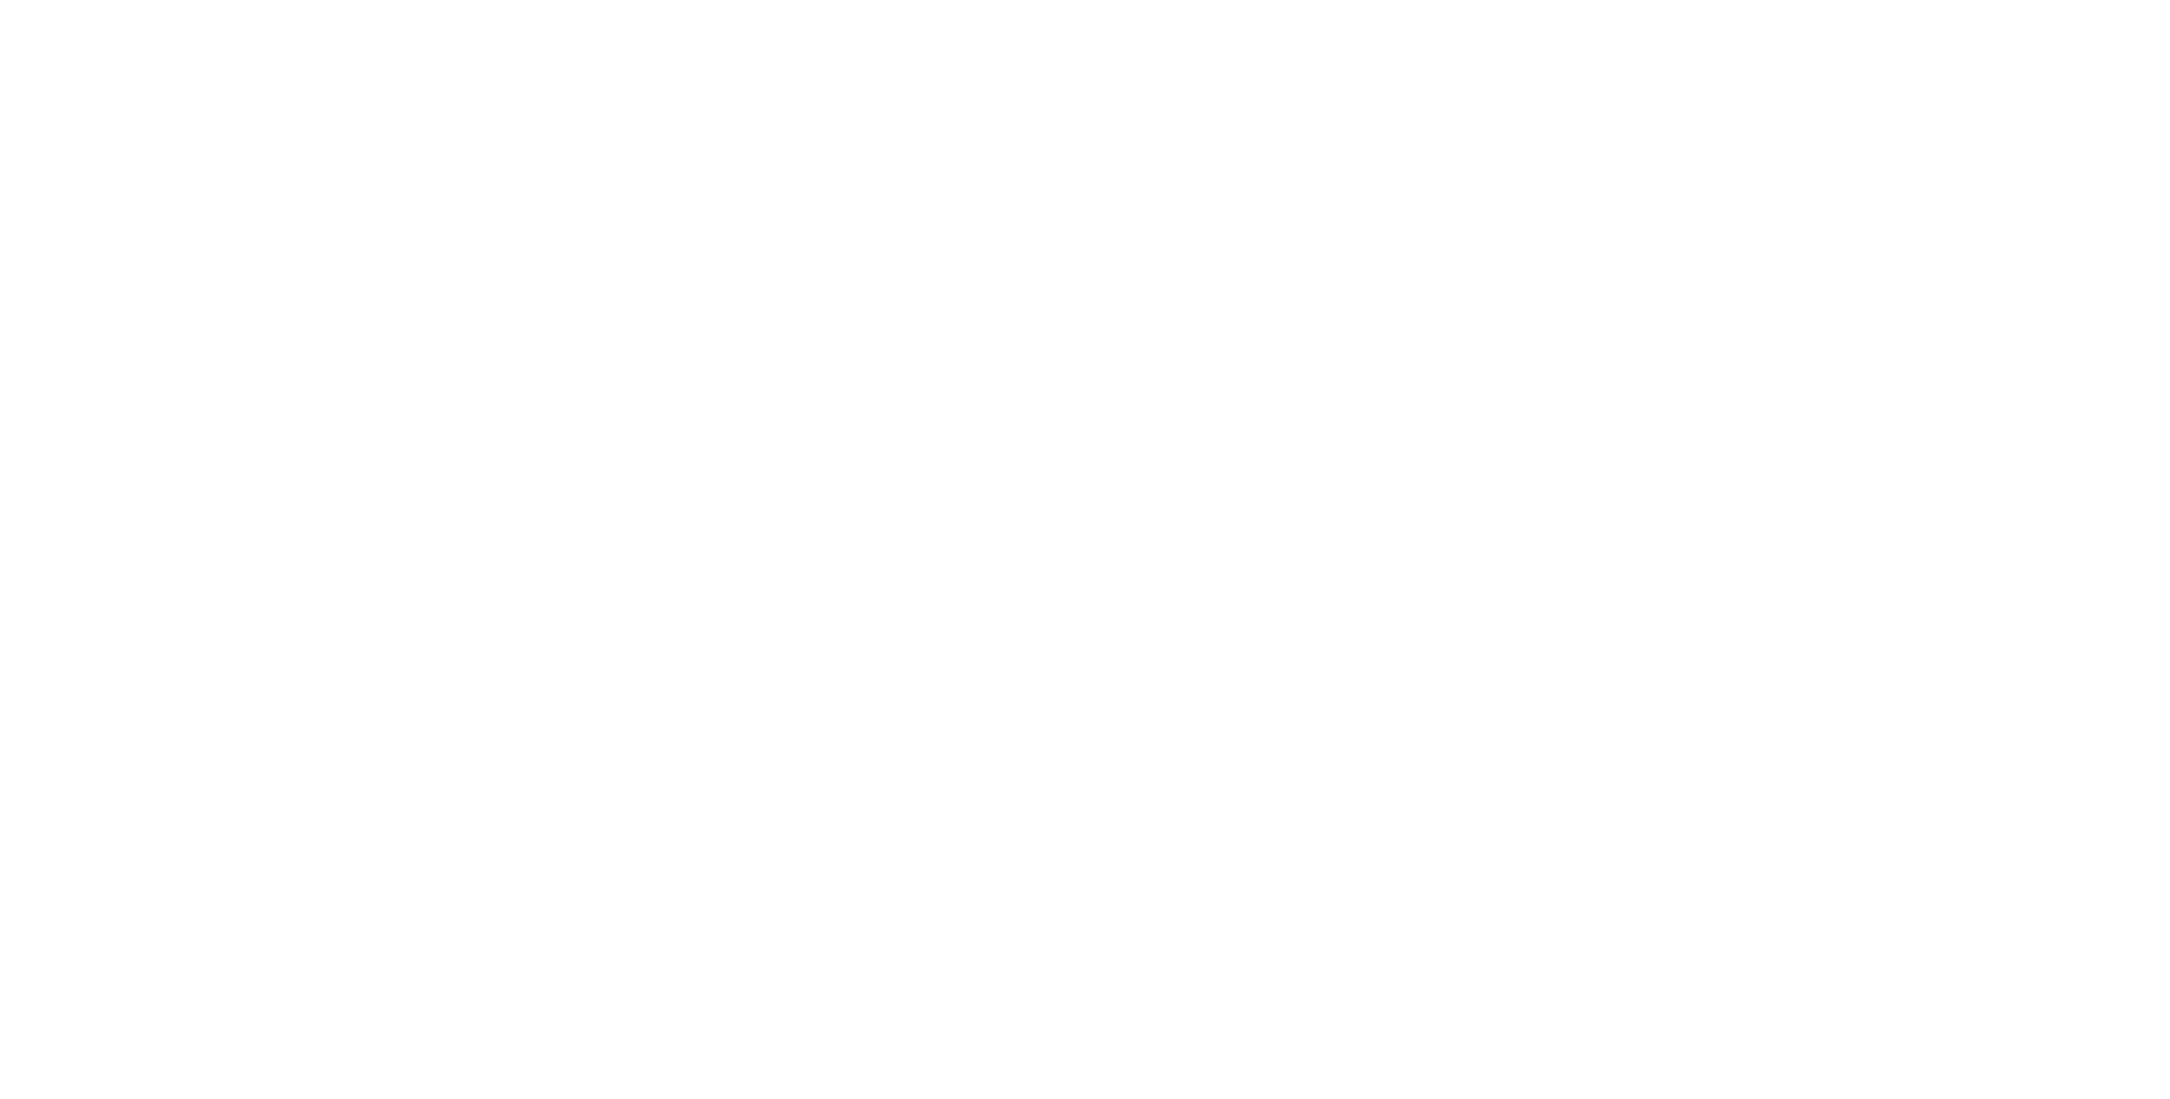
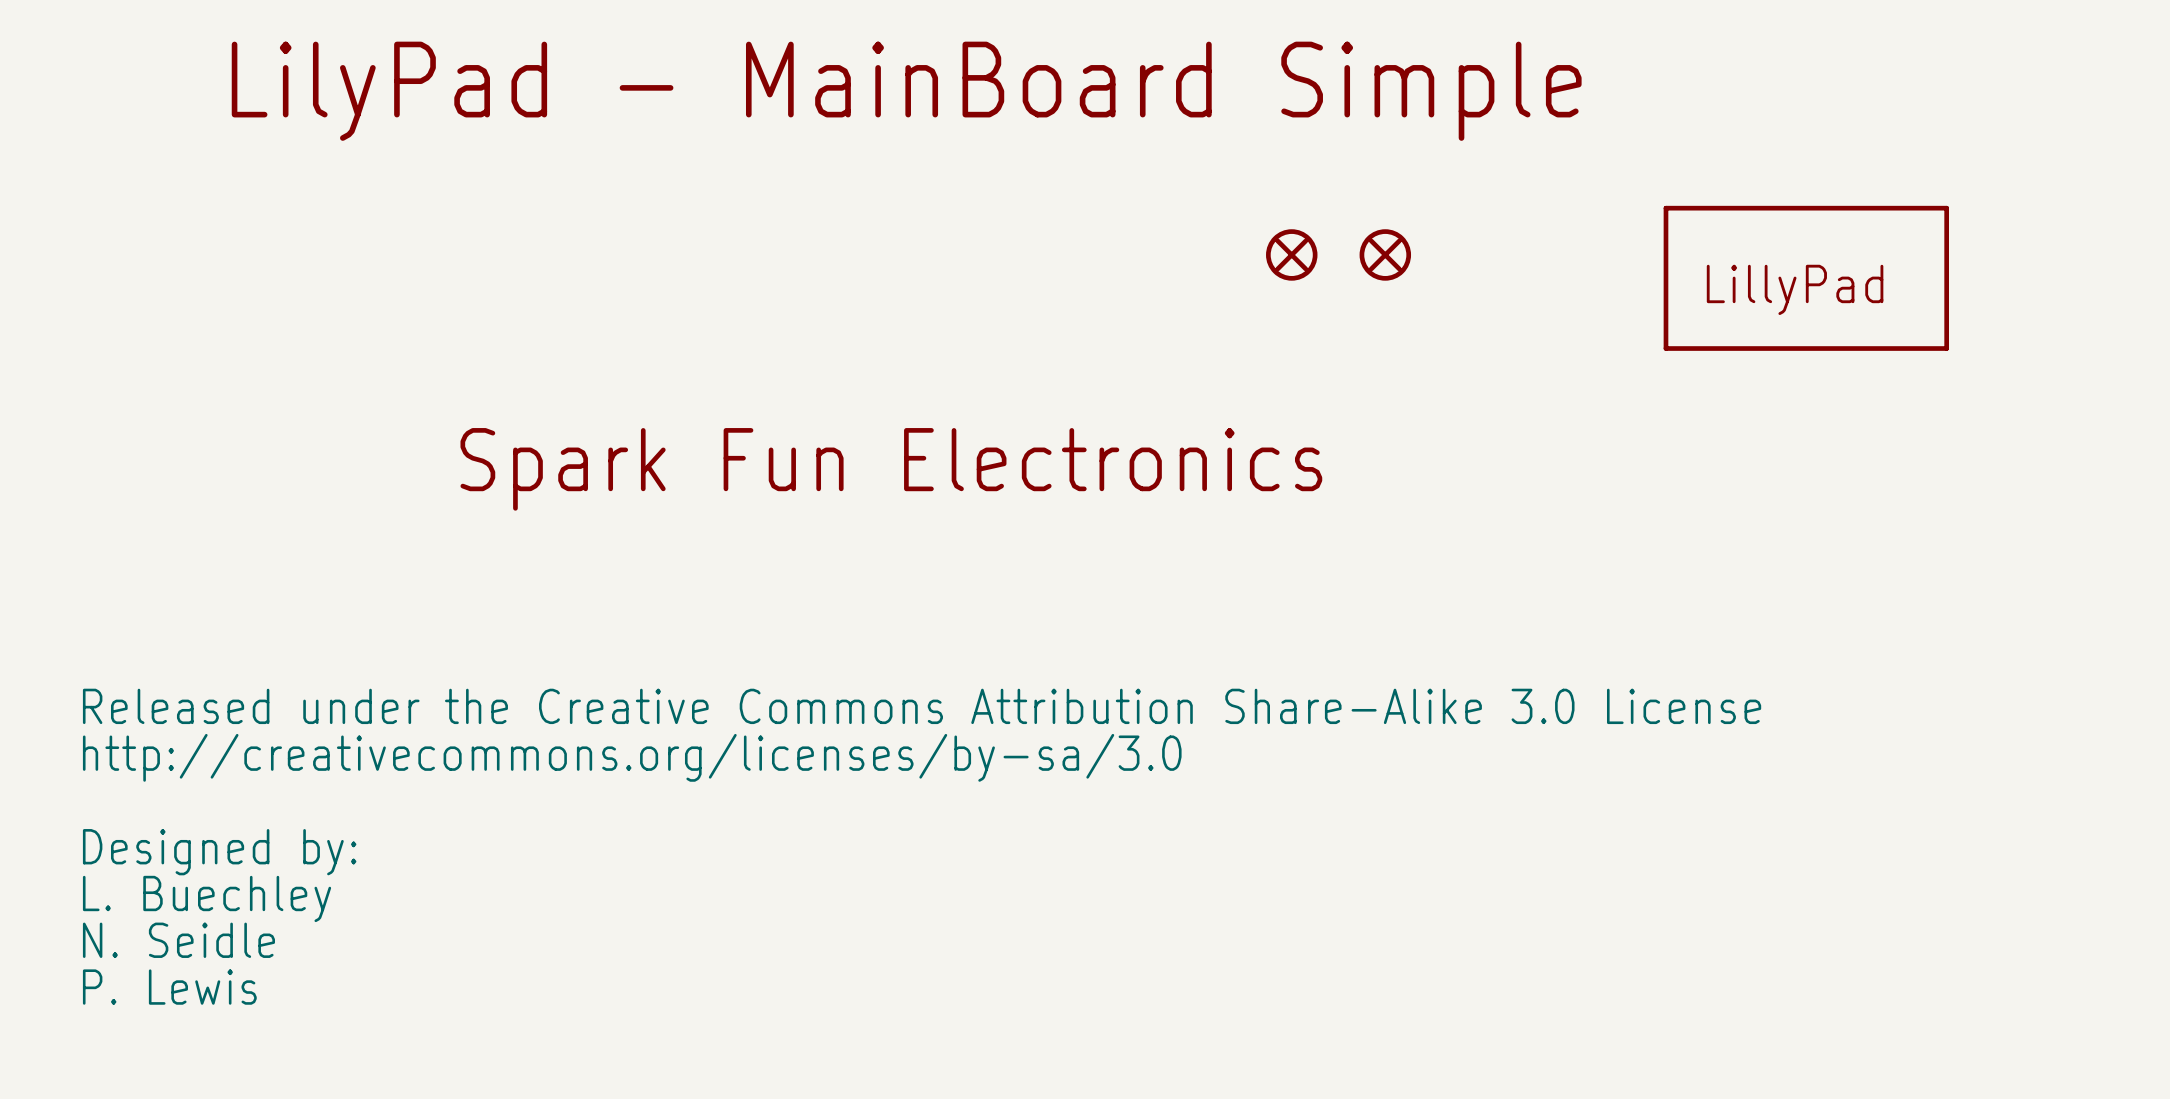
text: none -> LilyPad - MainBoard Simple (906, 91)
part: none -> (1291, 254)
part: none -> (1385, 254)
part: none -> (1806, 278)
text: none -> Spark Fun Electronics (891, 469)
text: none -> Released under the Creative Commons Attribution Share-Alike 3.0 License (922, 706)
text: none -> http://creativecommons.org/licenses/by-sa/3.0 (632, 757)
text: none -> Designed by: (219, 852)
text: none -> L. Buechley (207, 898)
text: none -> N. Seidle (178, 940)
text: none -> P. Lewis (169, 987)

